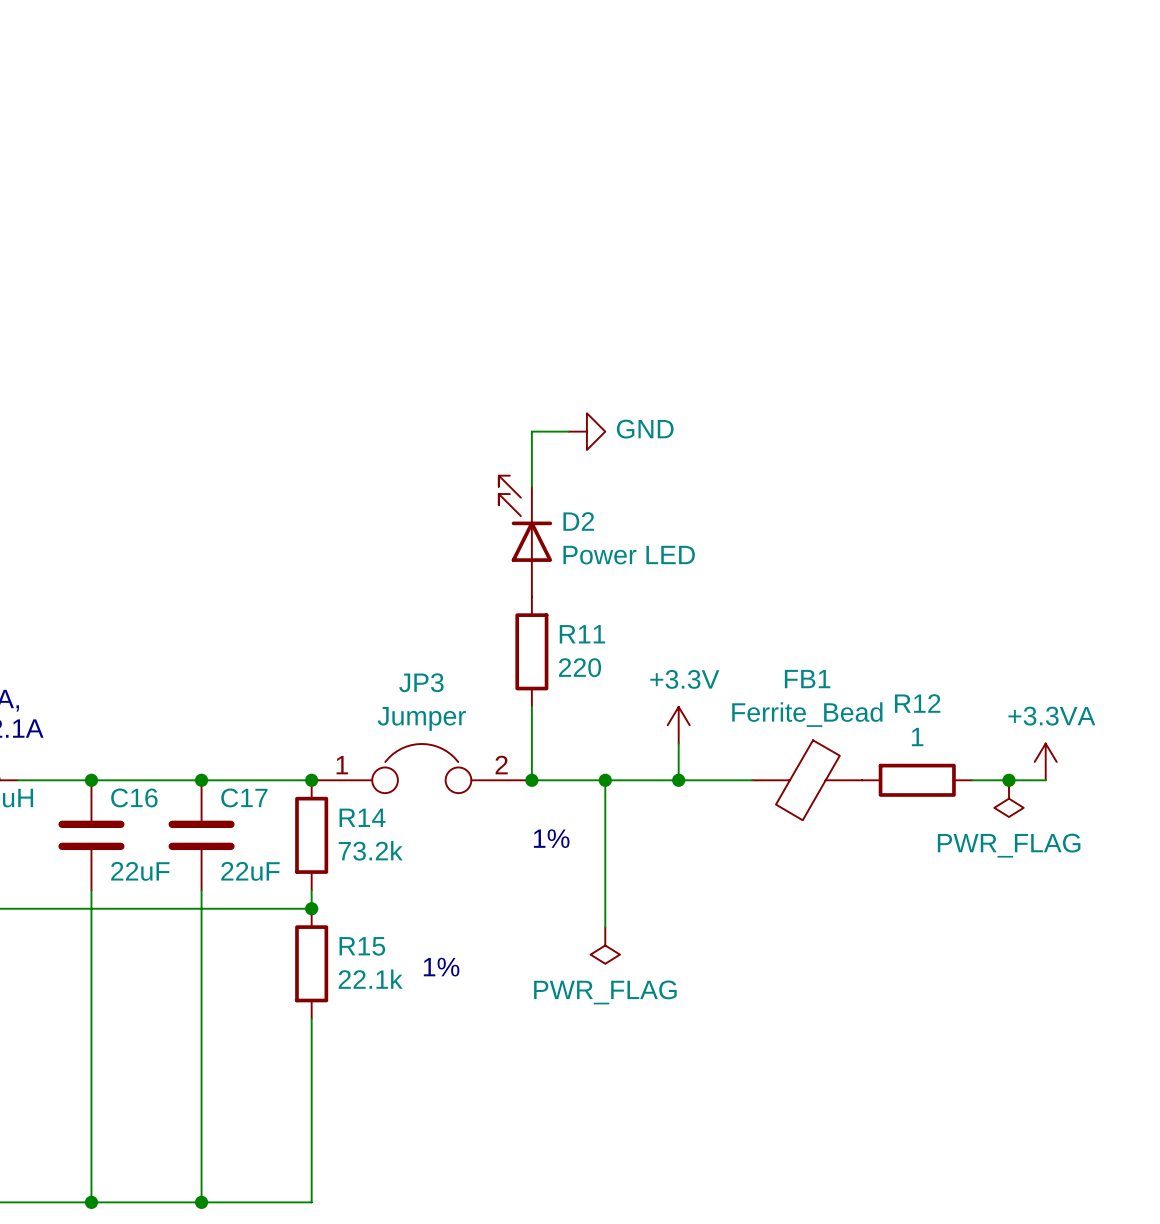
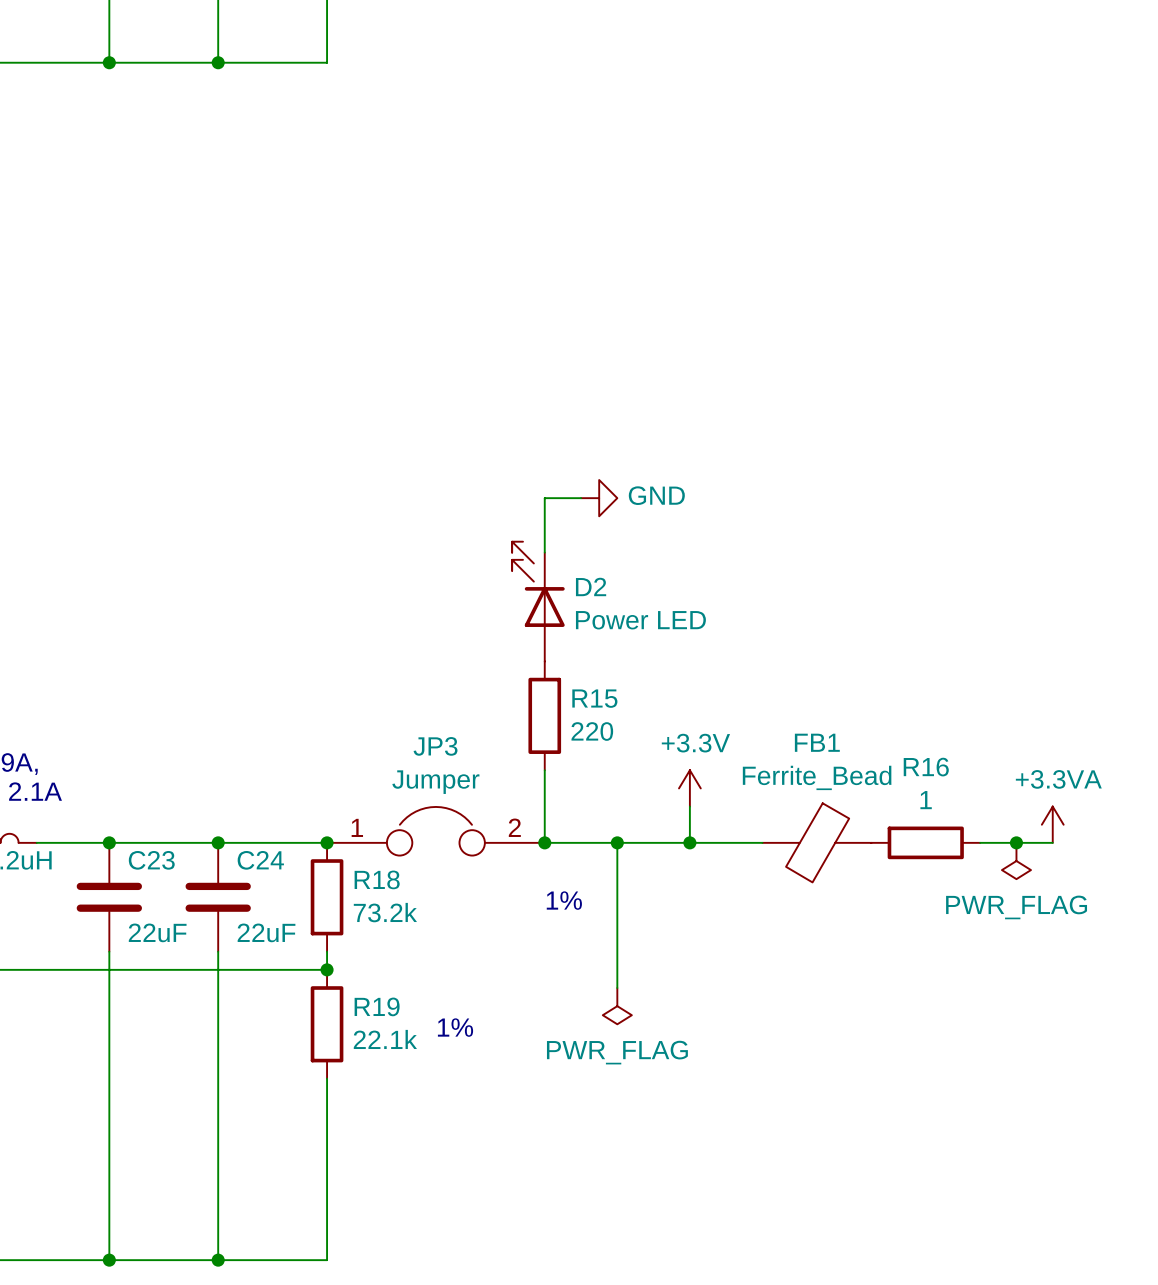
R11 name: R11 (582, 634) -> R15 (594, 698)
R12 name: R12 (917, 703) -> R16 (926, 767)
C16 name: C16 (134, 797) -> C23 (151, 860)
C17 name: C17 (244, 797) -> C24 (260, 860)
R14 name: R14 (362, 817) -> R18 (377, 879)
R15 name: R15 (362, 946) -> R19 (377, 1006)

